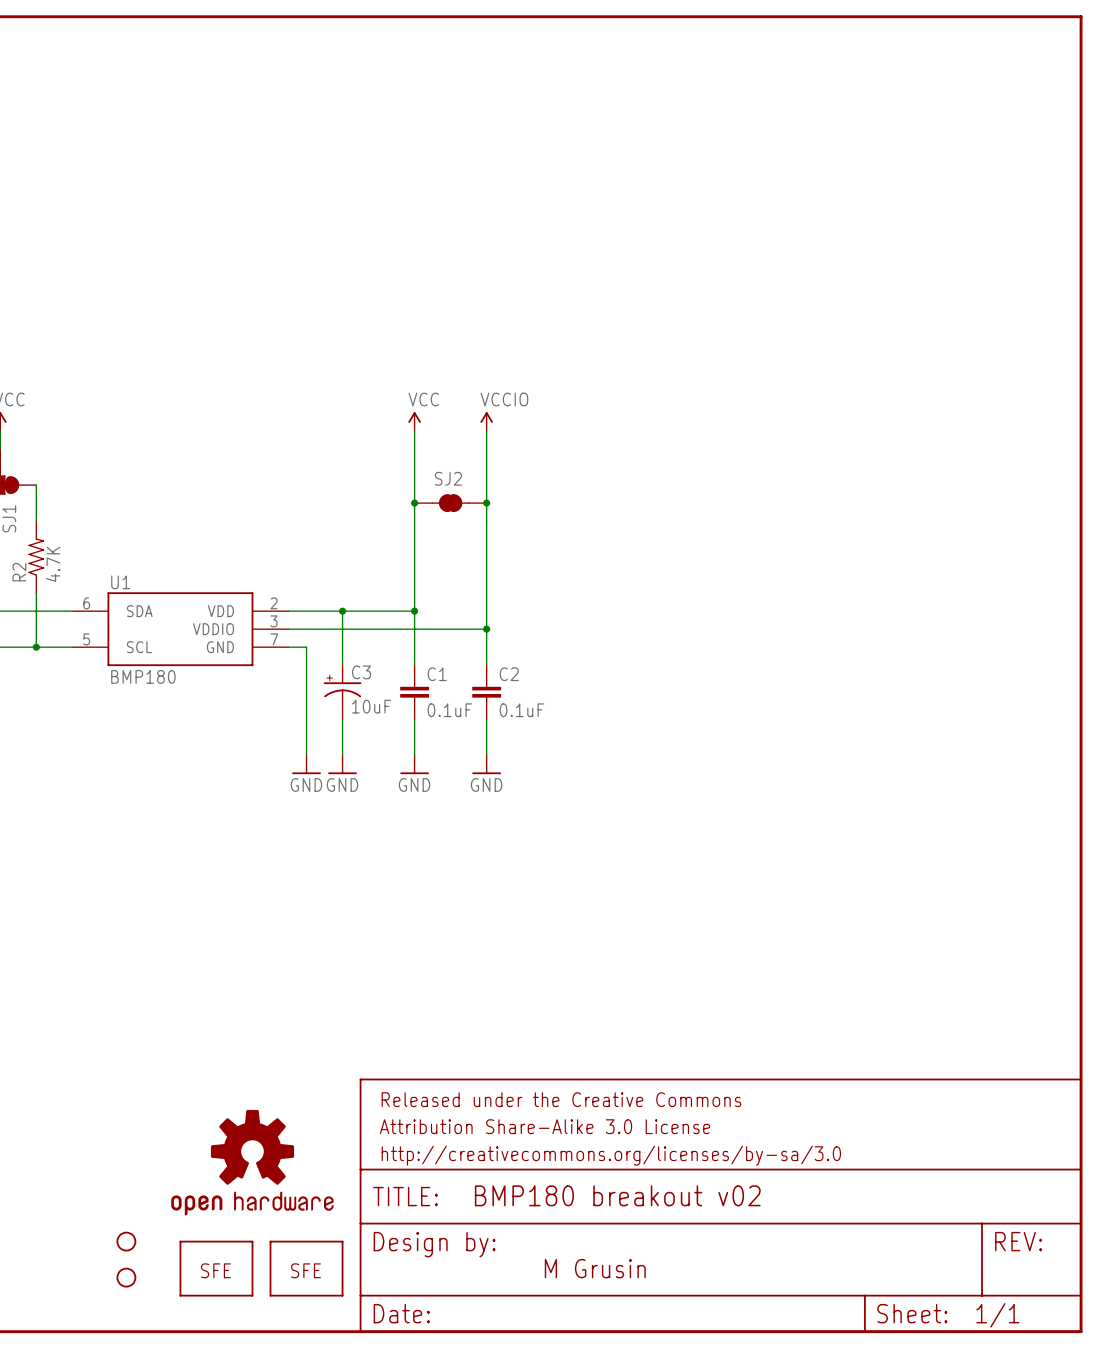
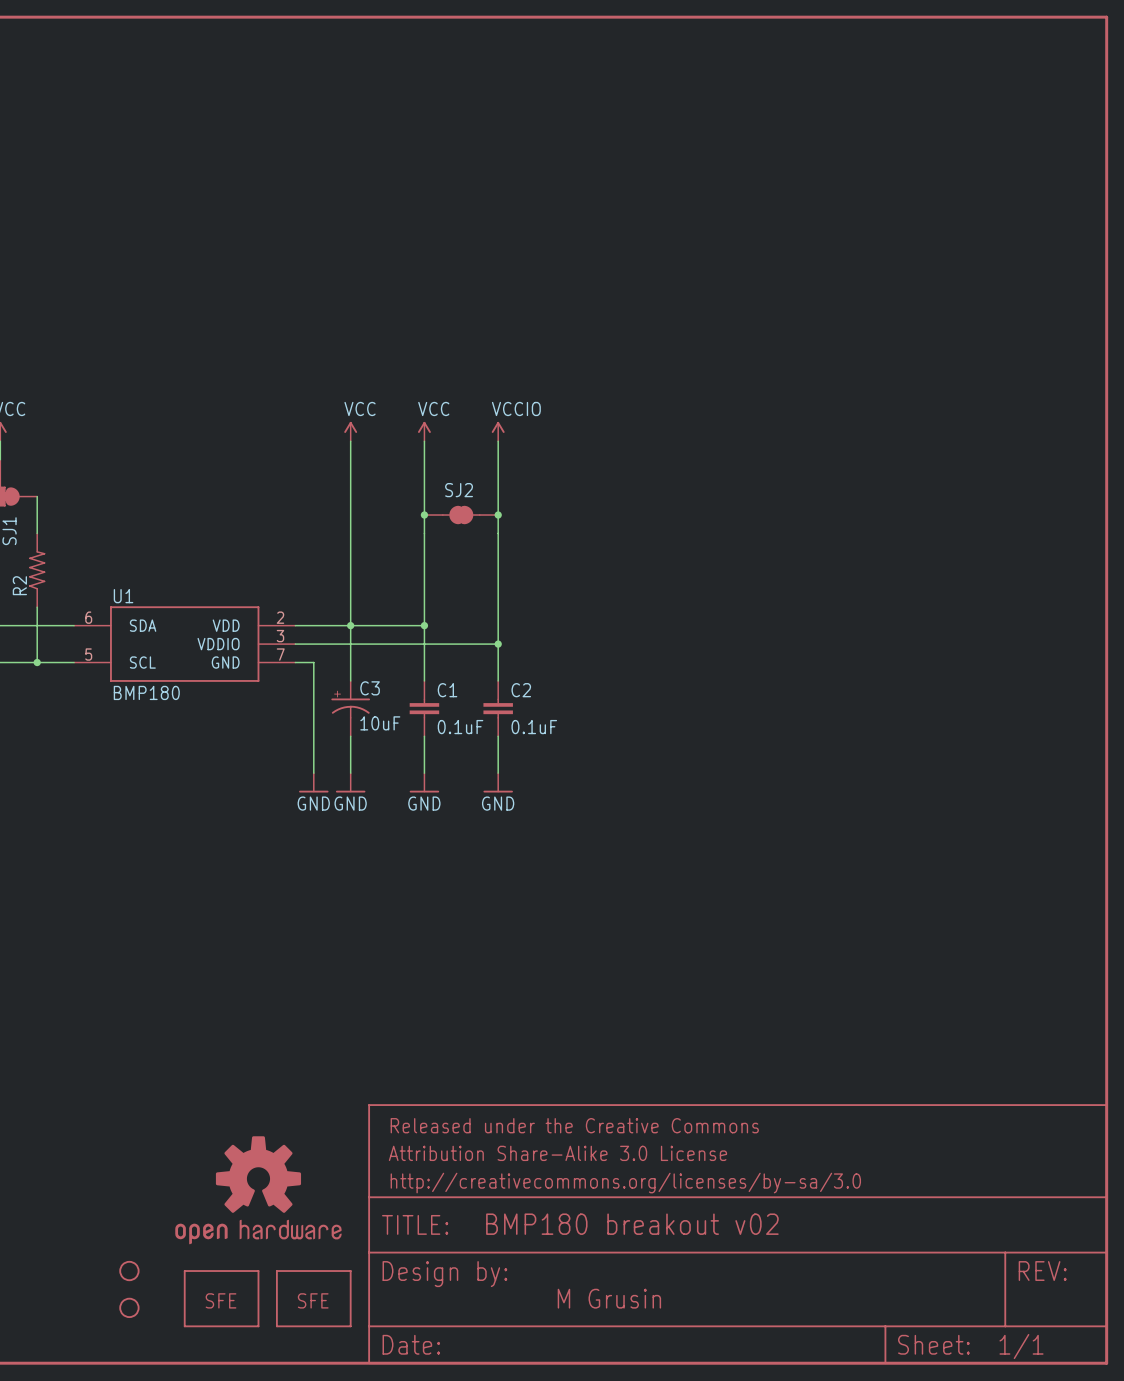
power symbol: none -> VCC (350, 431)
wire: none -> (350, 441) (350, 625)
R2 value: 4.7K (53, 564) -> none

